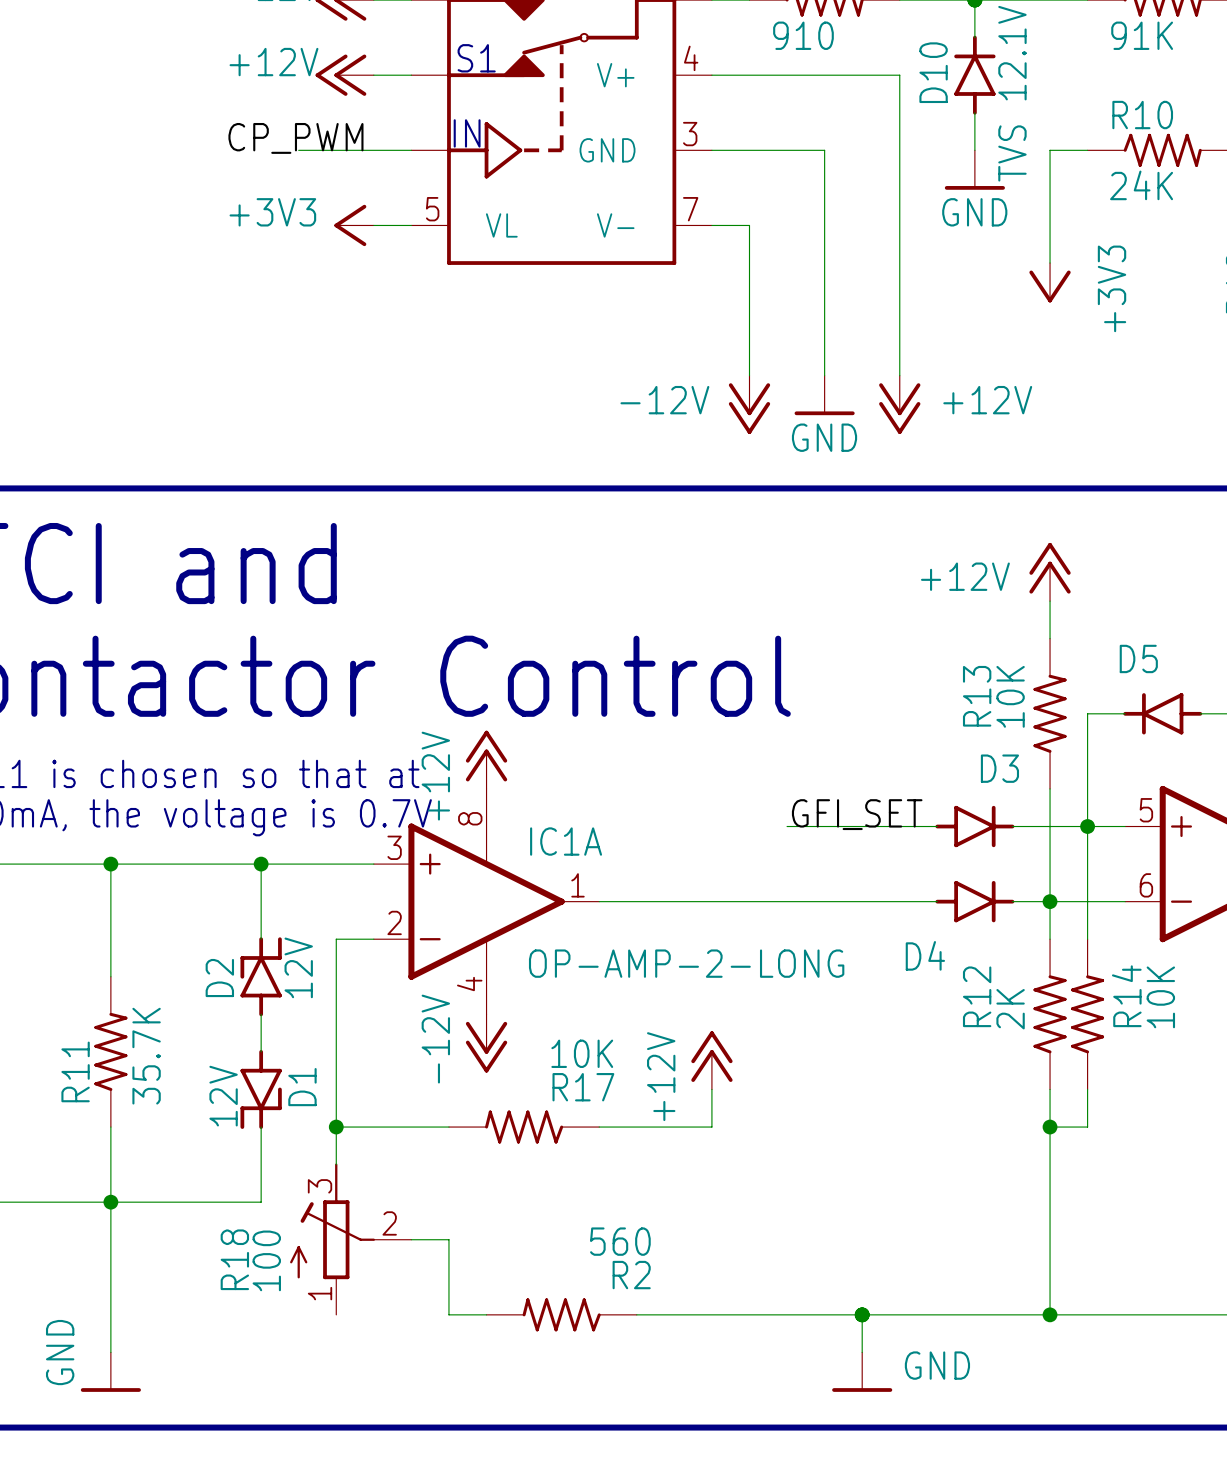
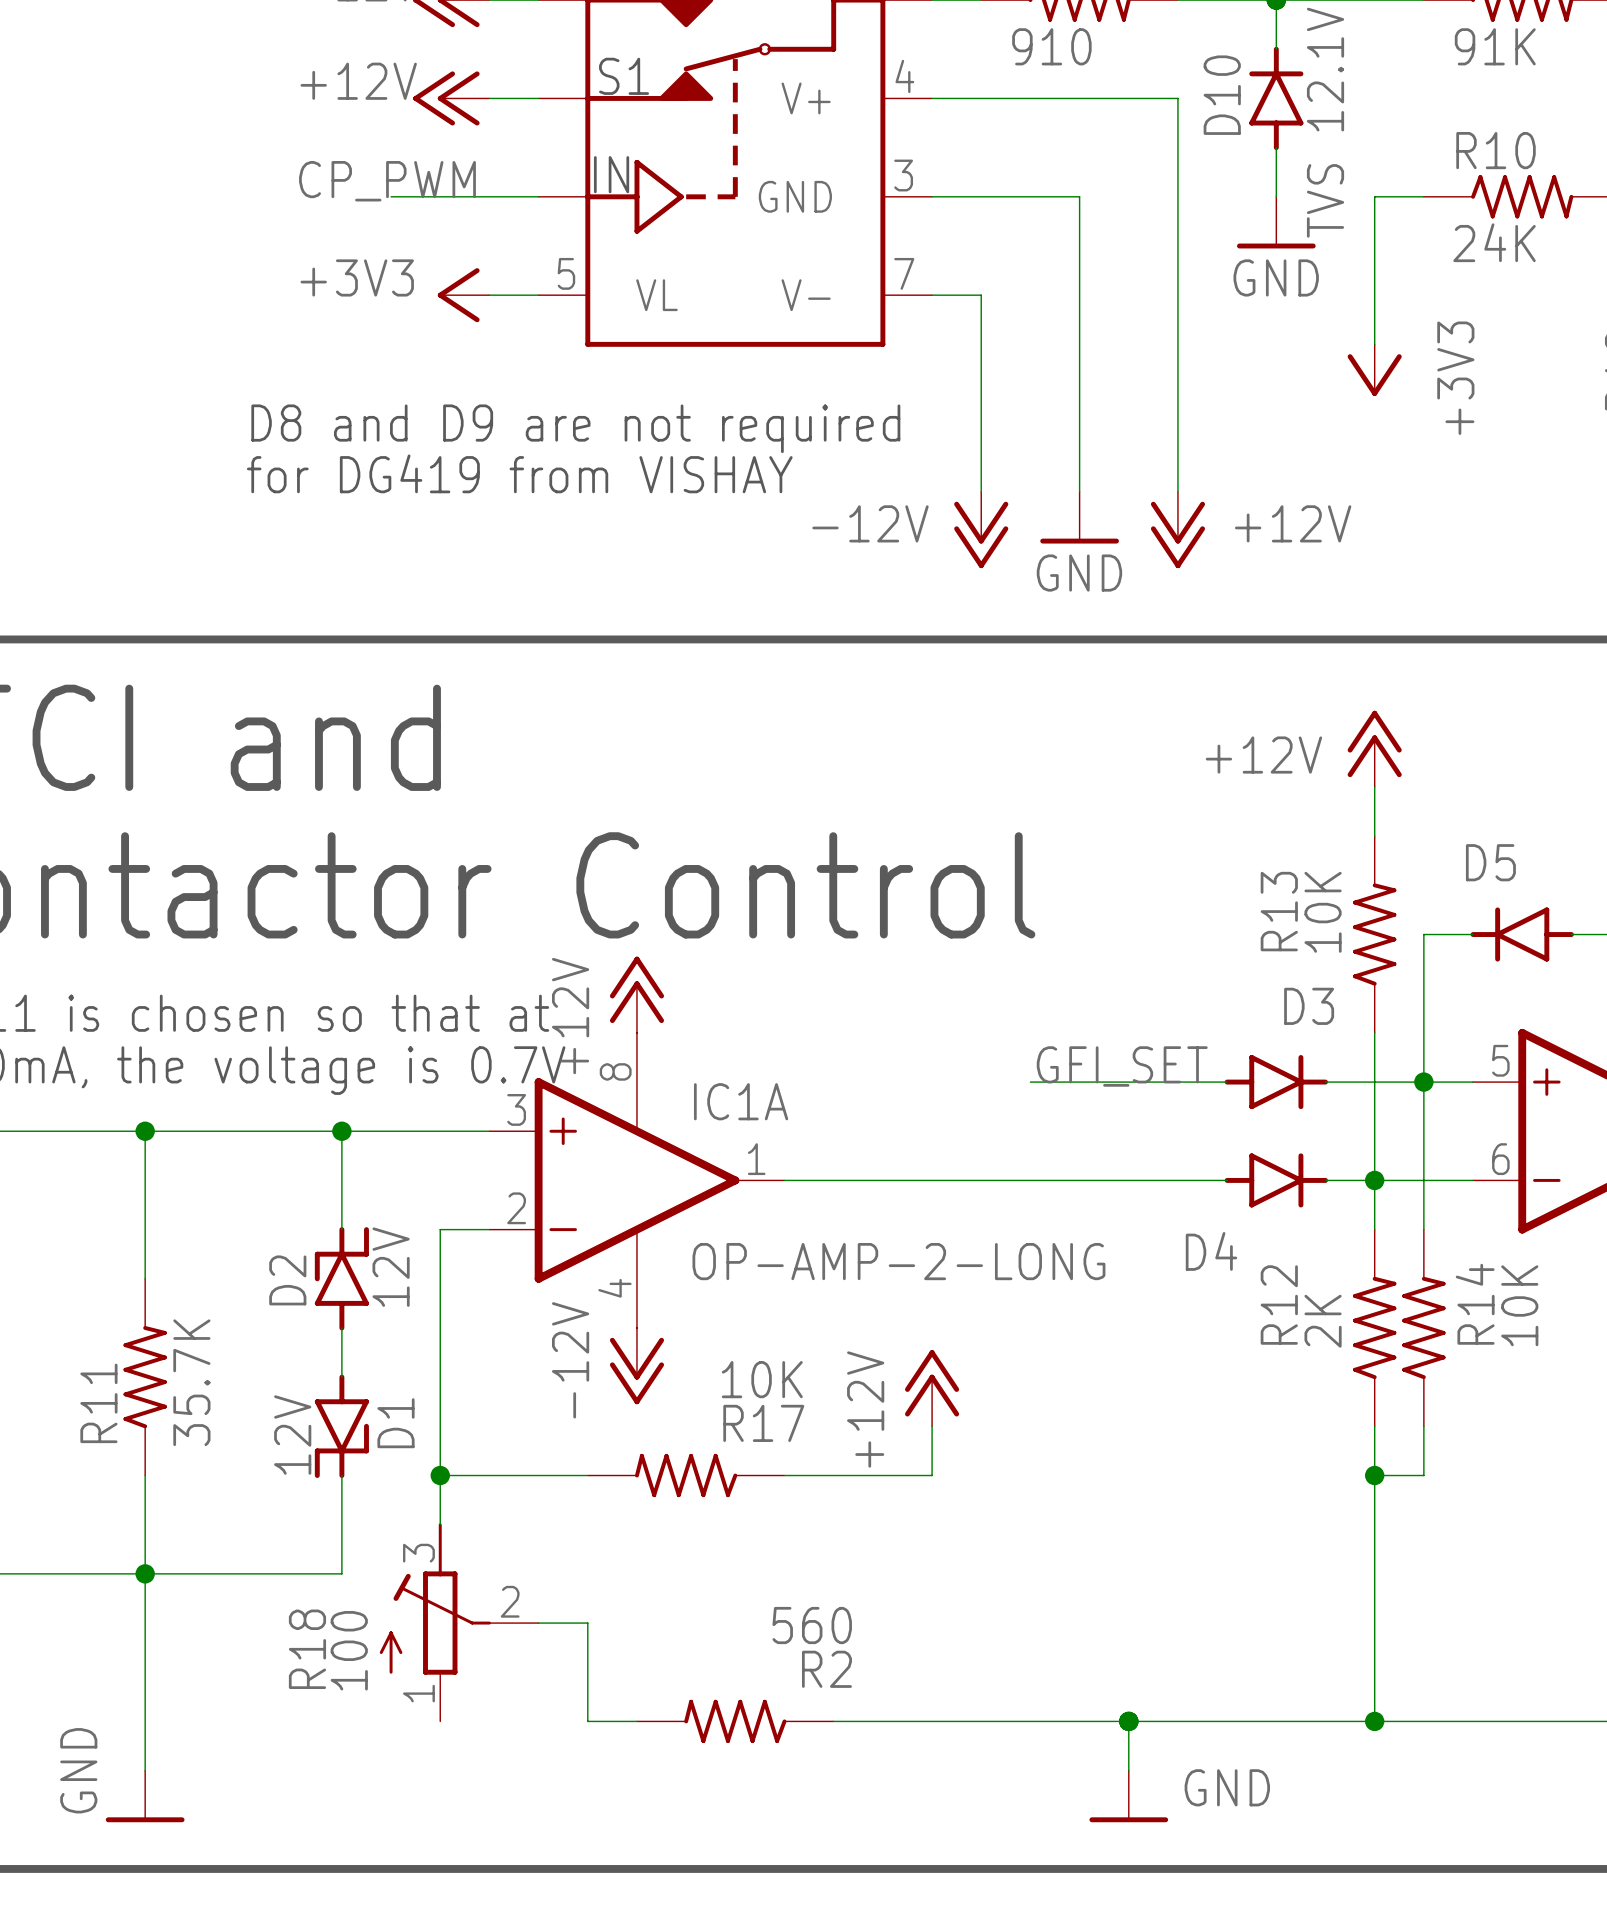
text: none -> D8 and D9 are not required (575, 428)
text: none -> for DG419 from VISHAY (519, 473)

